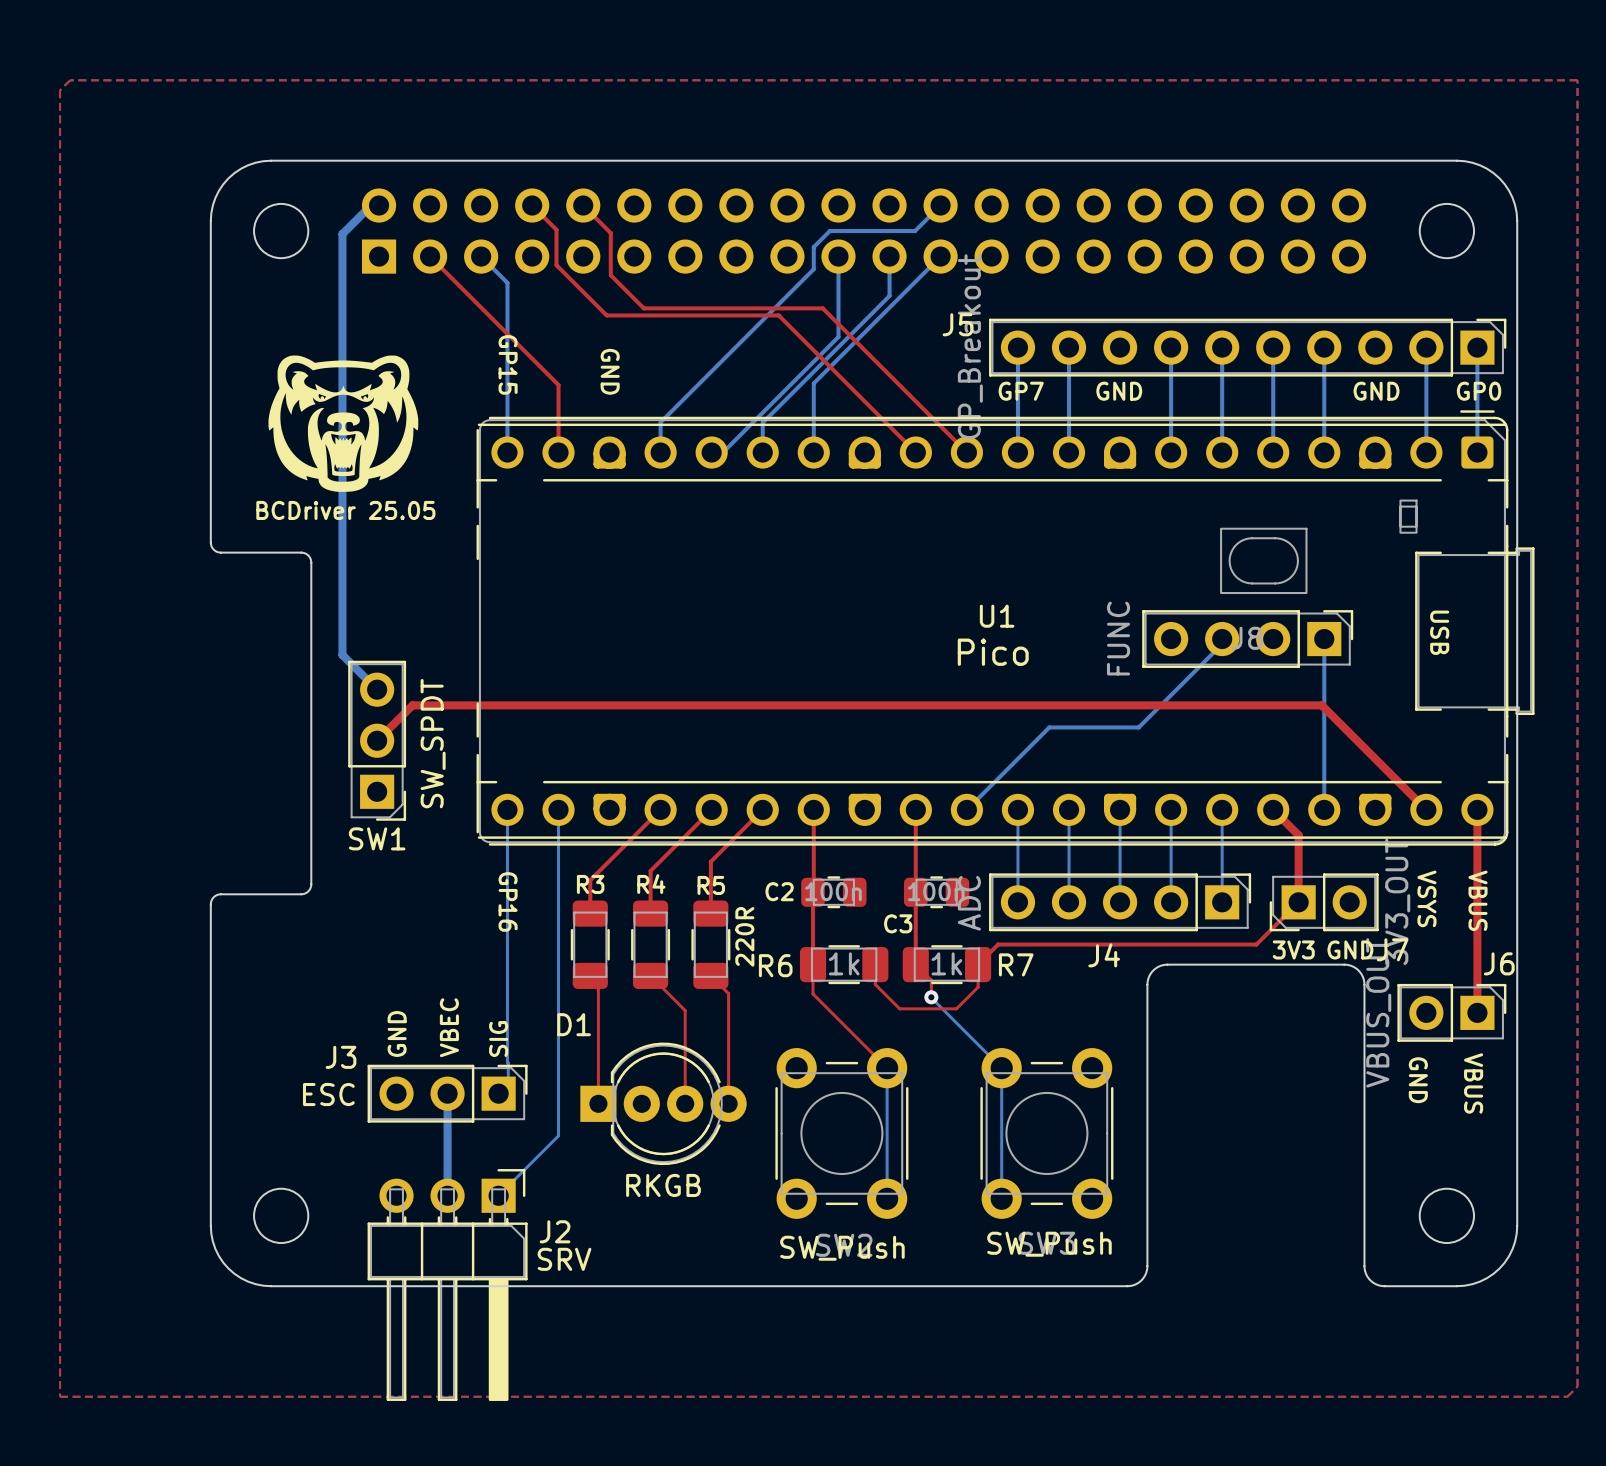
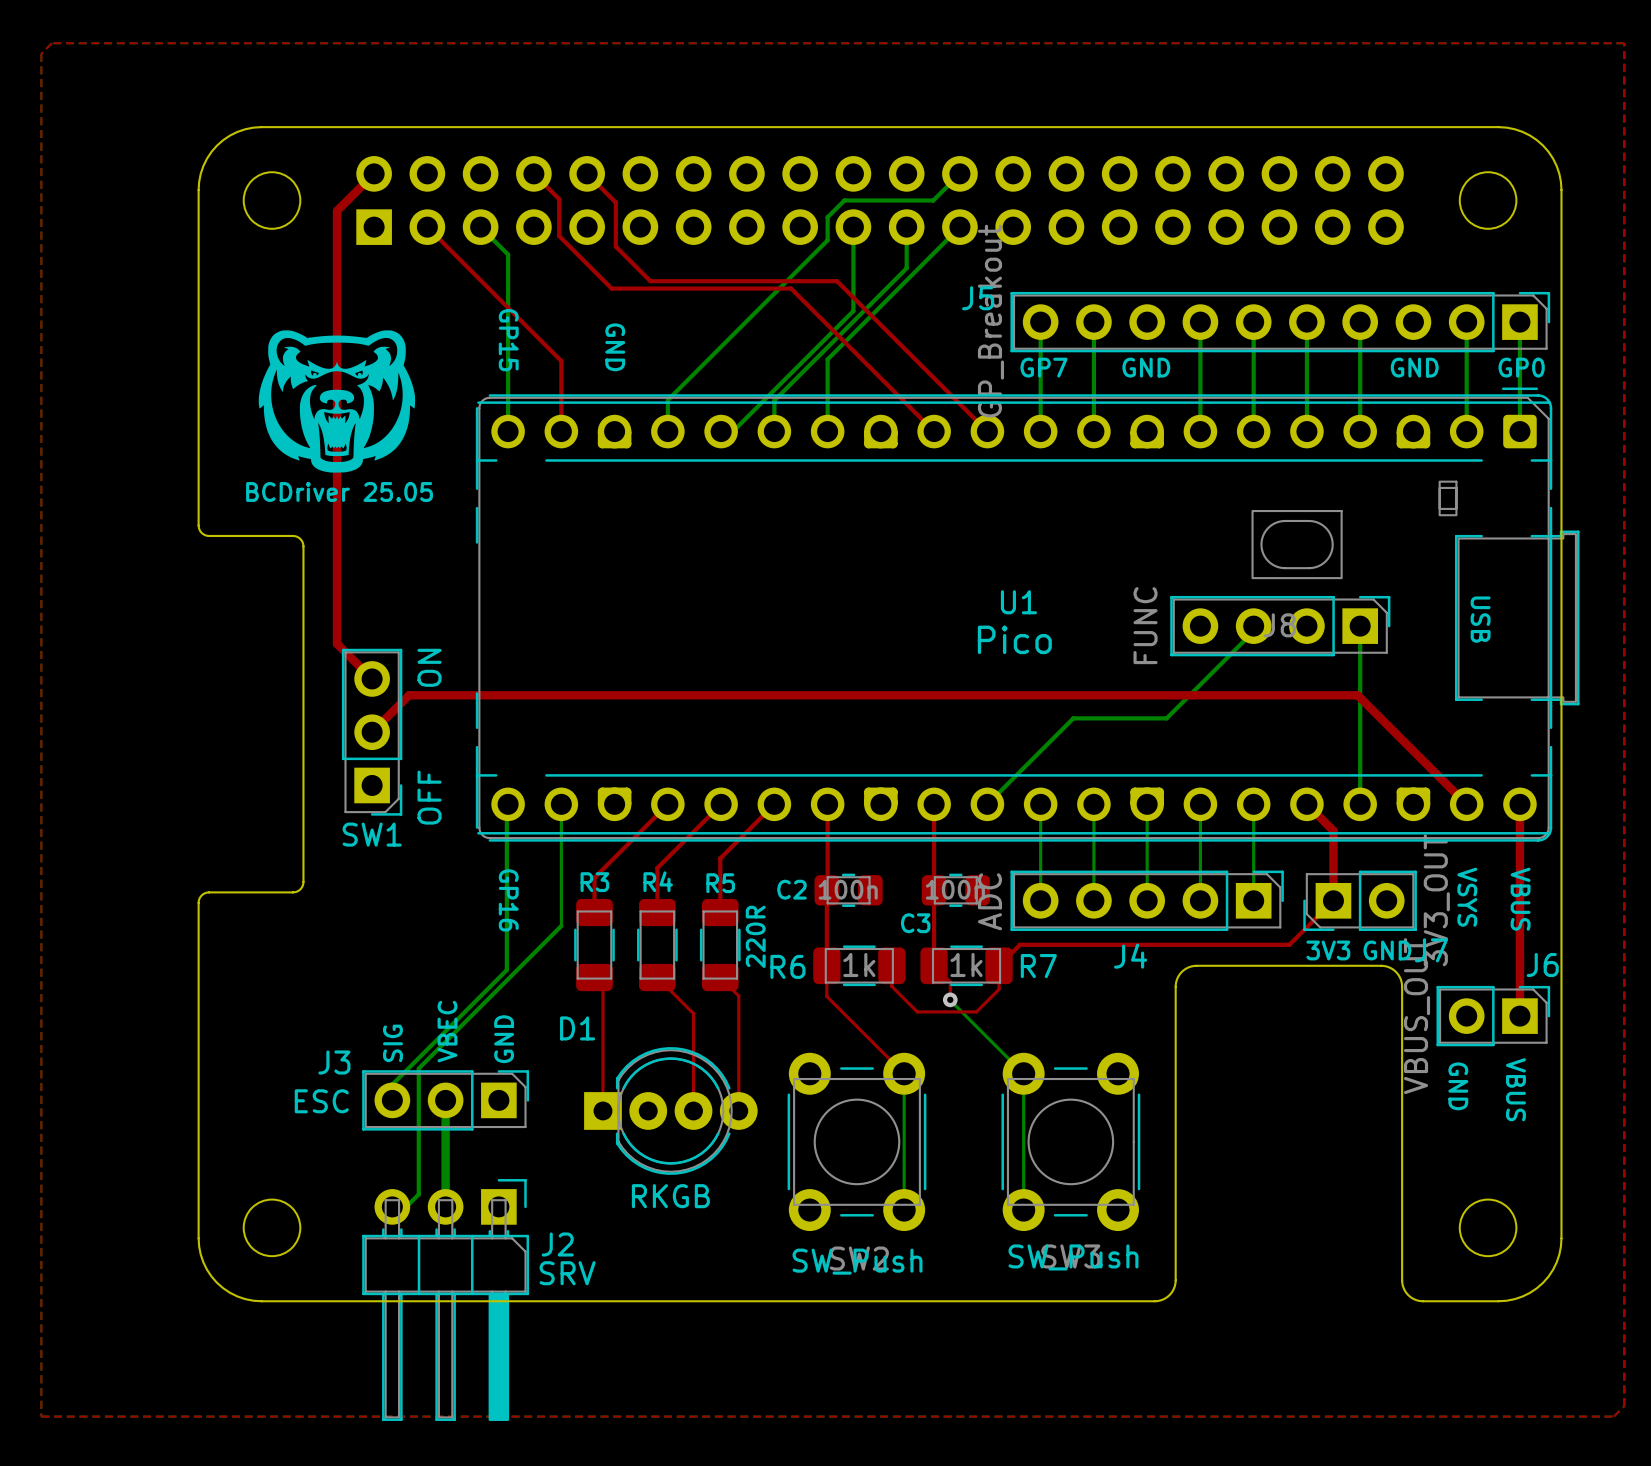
bottom track: (379, 205) (371, 205) (342, 234) (342, 655) (377, 689) -> none
top track: none -> (374, 173) (337, 210) (337, 643) (372, 678)
SW1 value: SW_SPDT (433, 743) -> OFF ON (429, 736)
bottom track: (507, 809) (508, 1084) (498, 1093) -> (508, 804) (506, 970) (392, 1084) (392, 1100)
bottom track: (558, 926) (558, 1135) (498, 1195) -> (561, 925) (418, 1068) (418, 1194) (406, 1206) (392, 1206)
text: GND (397, 1033) -> SIG (392, 1043)
text: SIG (498, 1039) -> GND (504, 1039)

